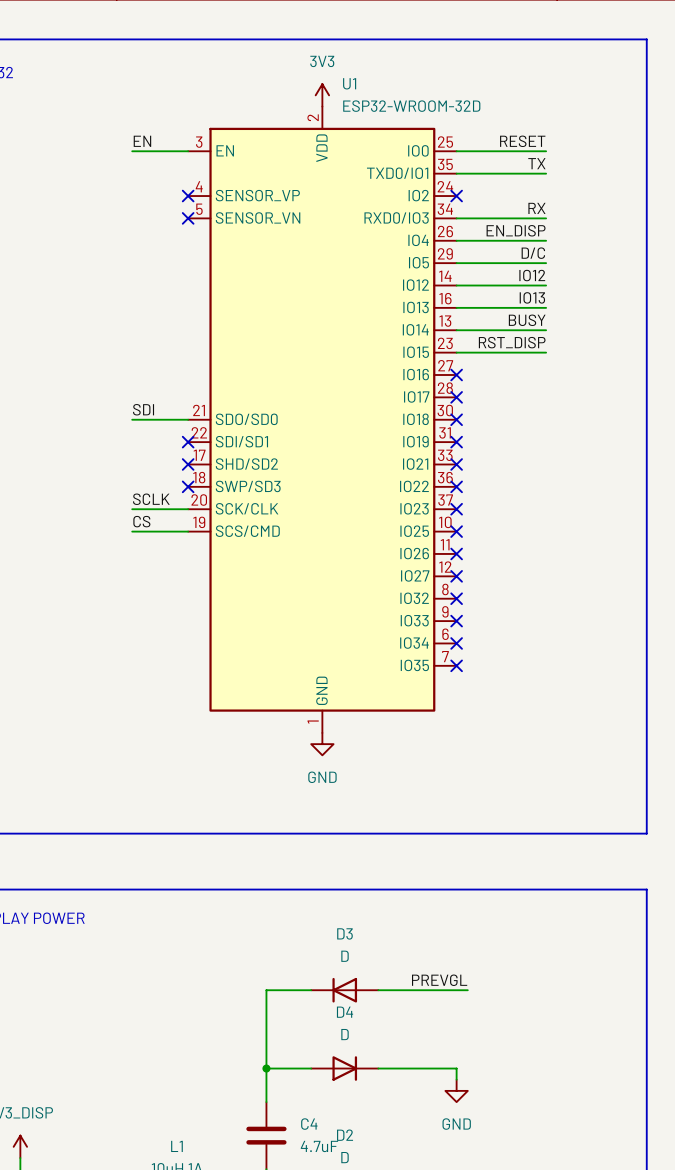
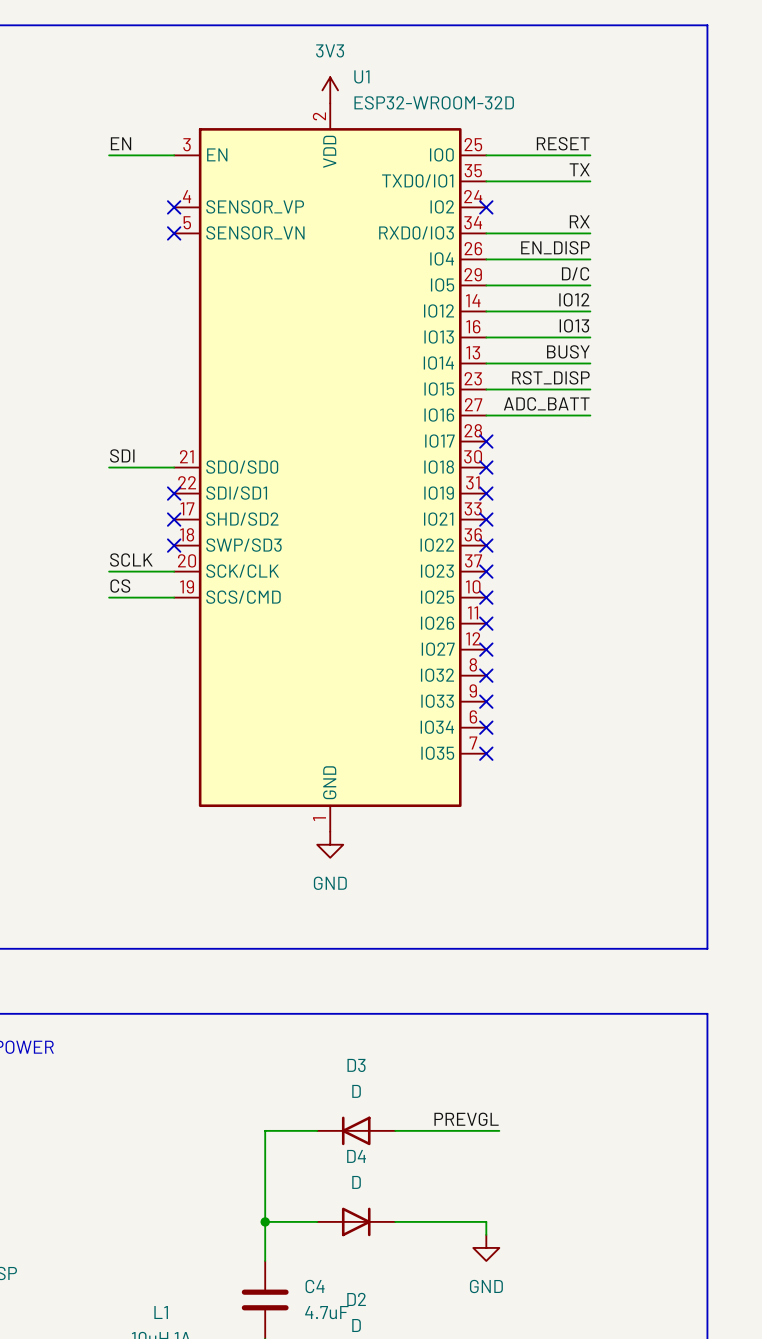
label: none -> ADC_BATT (546, 403)
wire: none -> (486, 415) (590, 415)
no-connect mark: (456, 375) -> none

